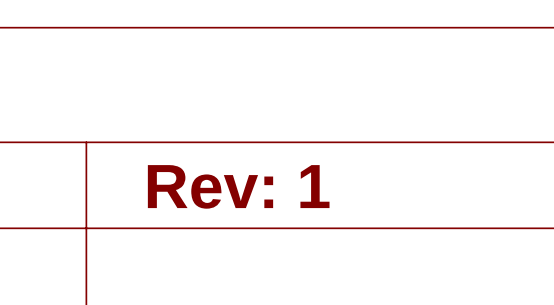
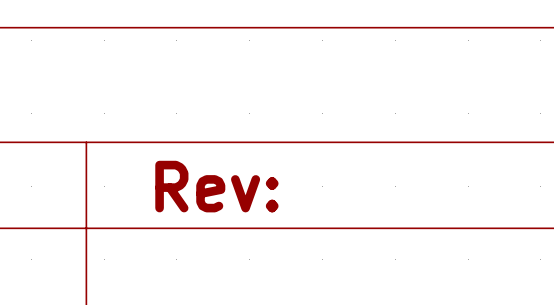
title block: Rev: 1 (238, 186) -> Rev: (216, 186)

